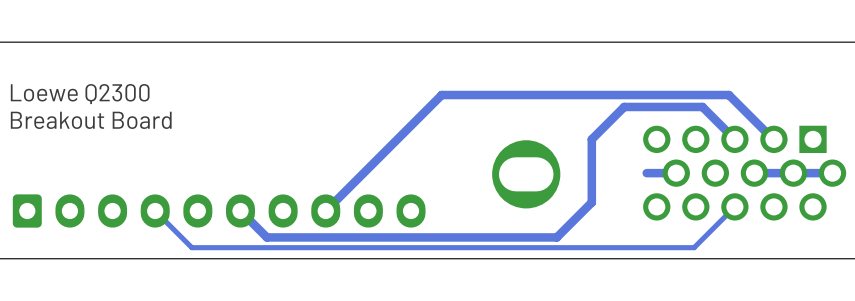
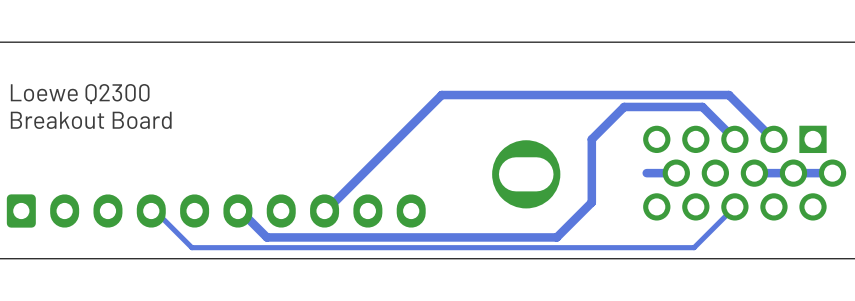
part footprint: [12, 194, 426, 228] -> [6, 194, 426, 228]

